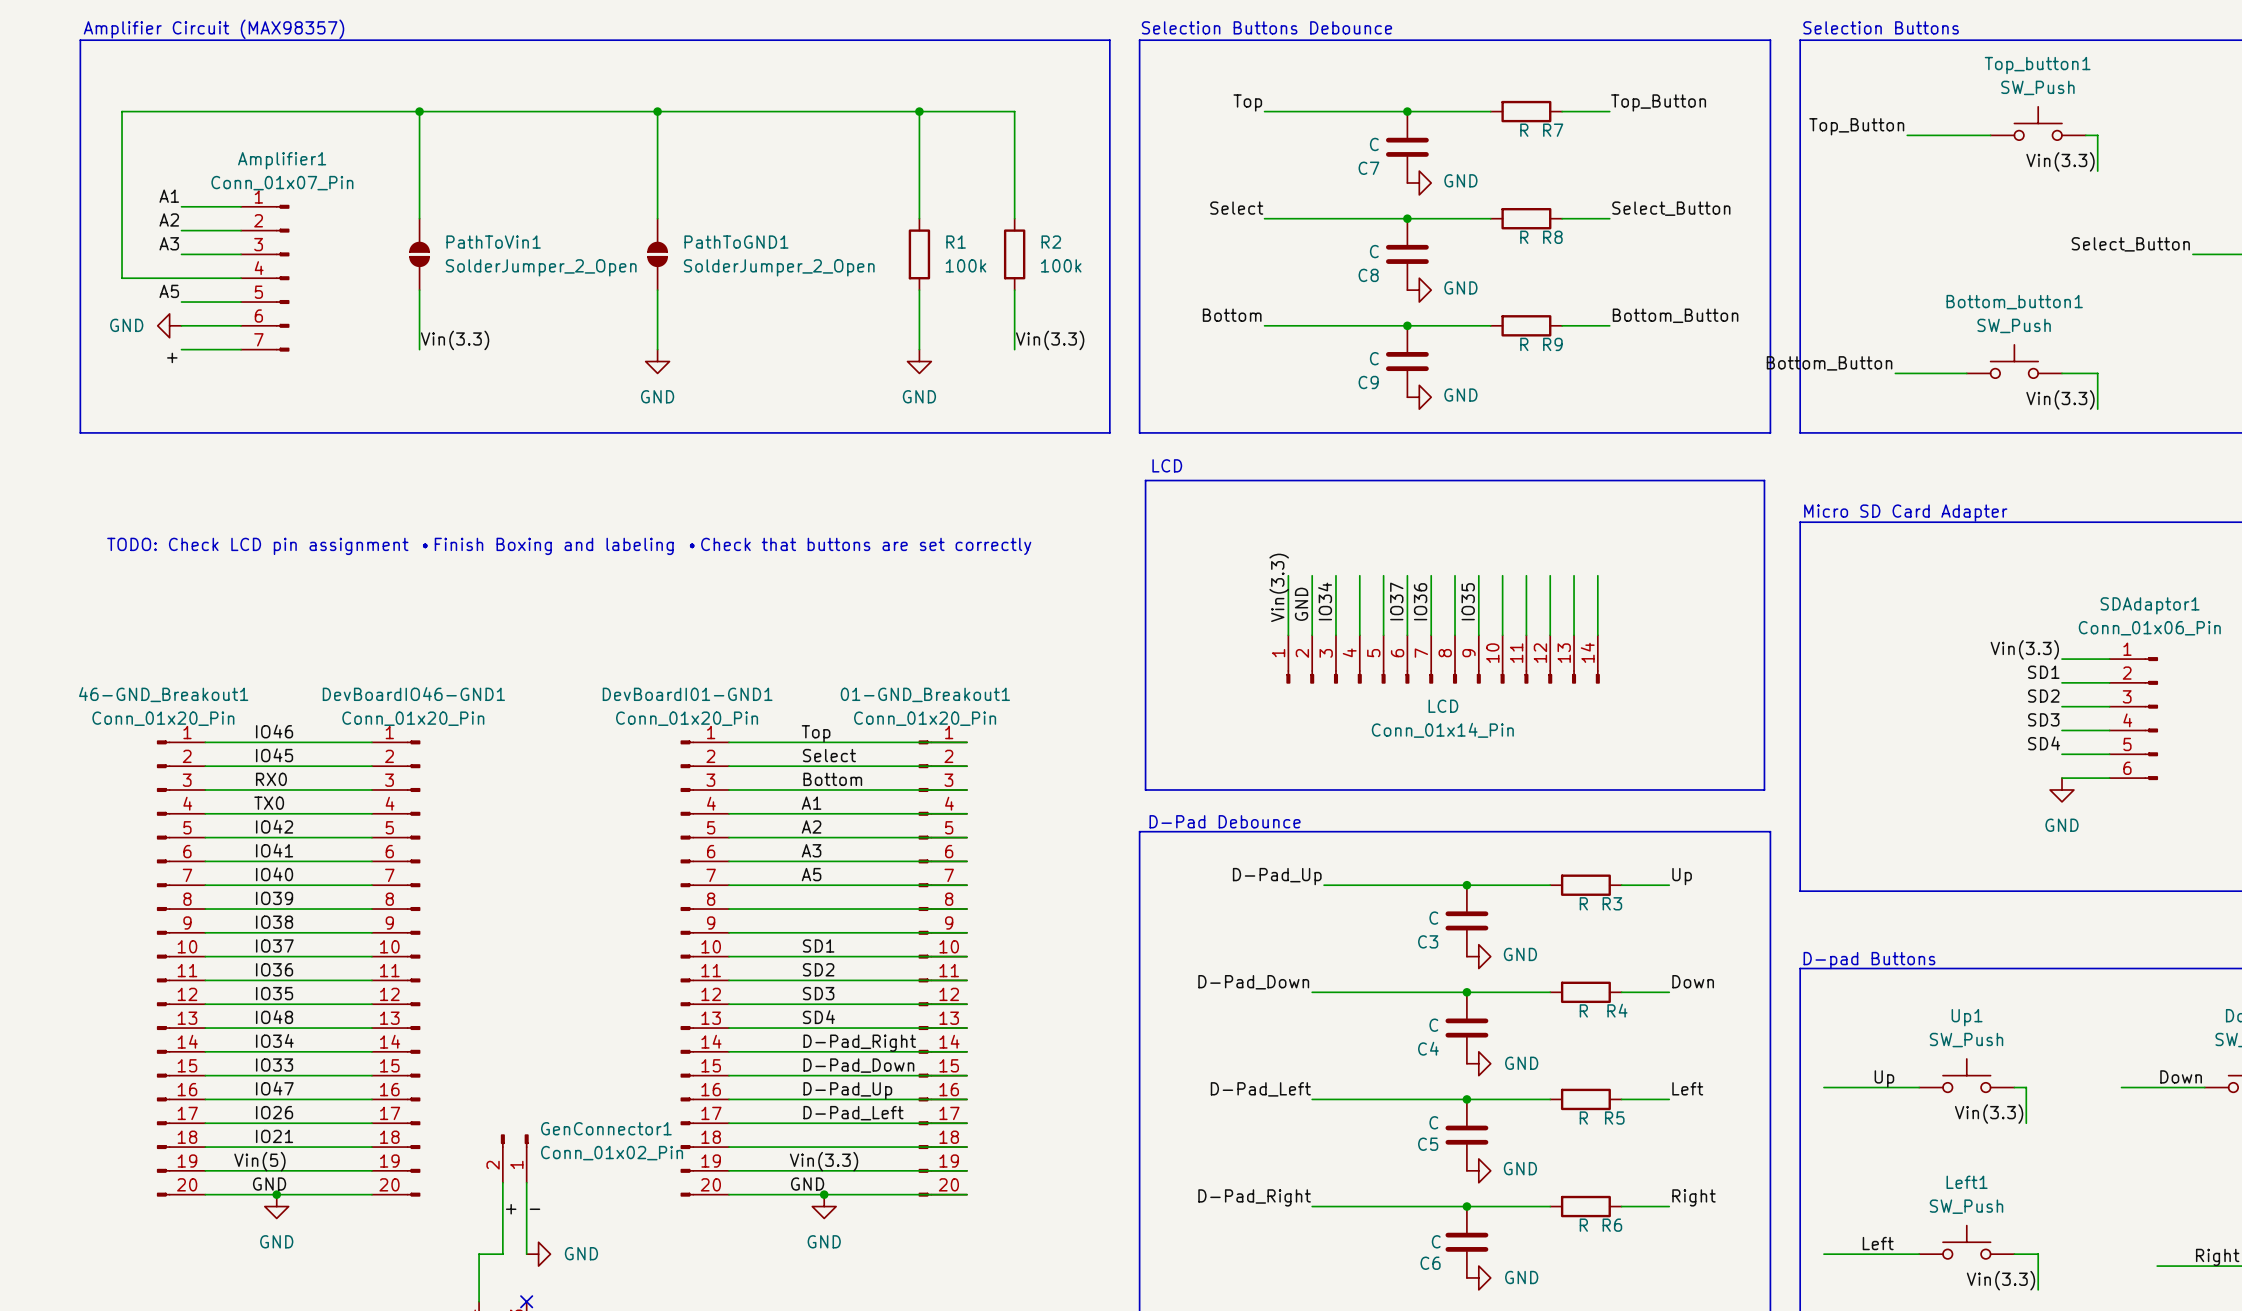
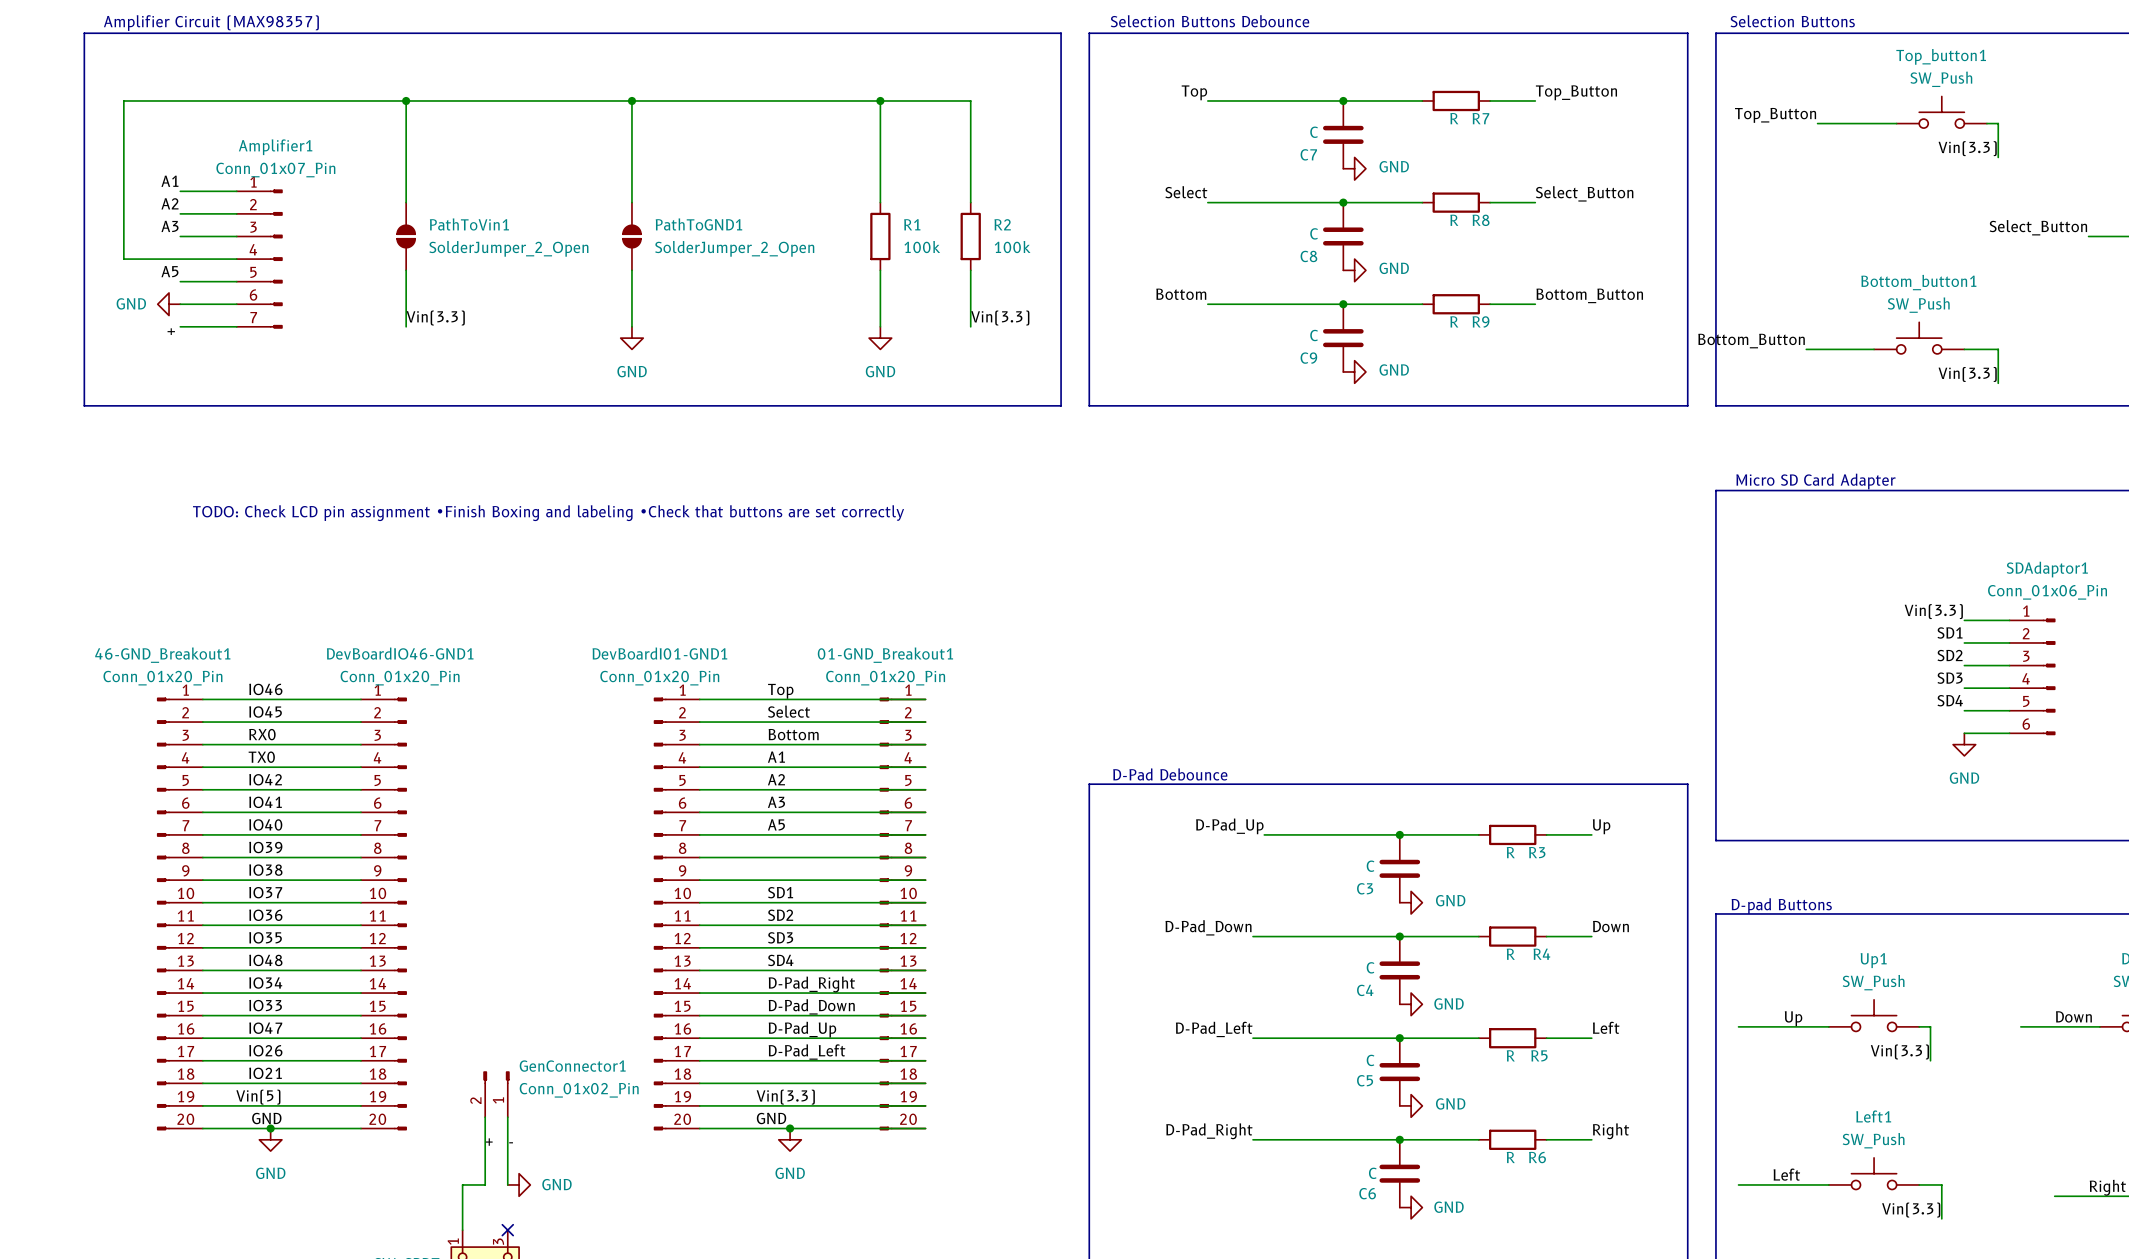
text: LCD (1167, 465) -> none
line: (1145, 480) (1764, 480) (1764, 789) (1145, 789) (1145, 480) -> none
wire: (1288, 575) (1288, 635) -> none
wire: (1312, 575) (1312, 635) -> none
wire: (1335, 575) (1335, 635) -> none
wire: (1359, 575) (1359, 635) -> none
wire: (1383, 575) (1383, 635) -> none
wire: (1407, 575) (1407, 635) -> none
wire: (1431, 575) (1431, 635) -> none
wire: (1455, 575) (1455, 635) -> none
wire: (1478, 575) (1478, 635) -> none
wire: (1502, 575) (1502, 635) -> none
wire: (1526, 575) (1526, 635) -> none
wire: (1550, 575) (1550, 635) -> none
wire: (1574, 575) (1574, 635) -> none
wire: (1597, 575) (1597, 635) -> none
label: Vin(3.3) (1279, 587) -> none
label: IO34 (1325, 601) -> none
label: IO37 (1396, 601) -> none
label: IO36 (1420, 601) -> none
label: IO35 (1468, 601) -> none
label: GND (1301, 604) -> none
LCD: Conn_01x14_Pin (1443, 659) -> none

